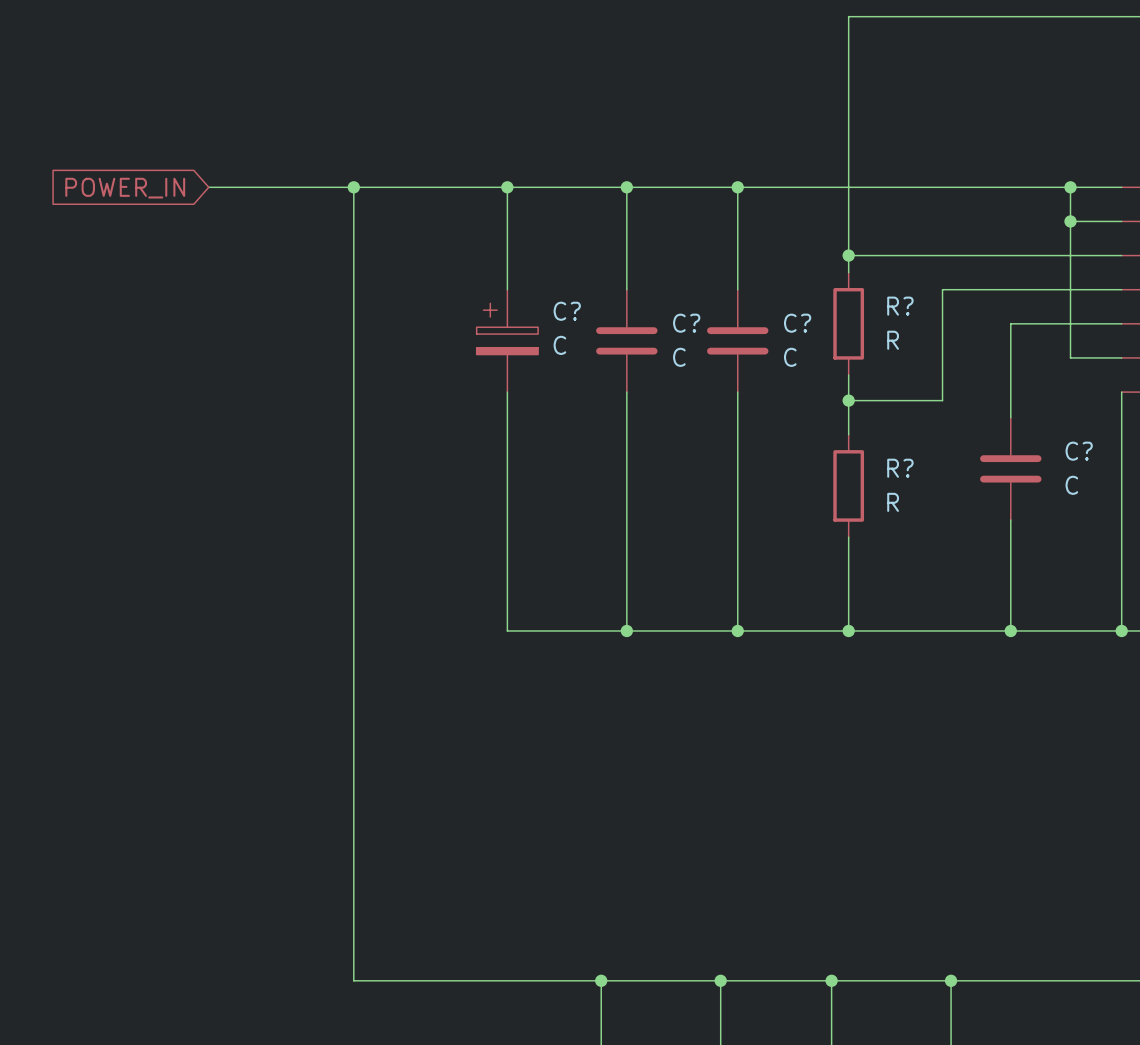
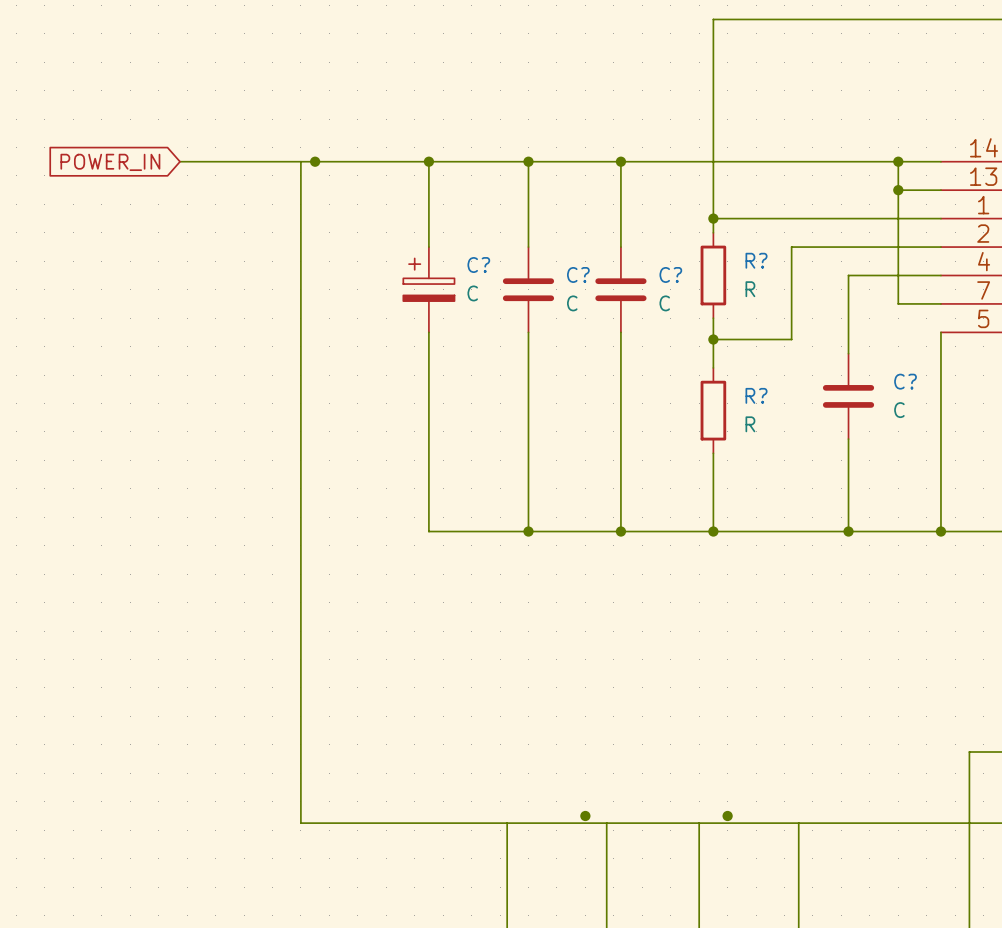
junction position: (353, 187) -> (315, 161)
junction: (601, 980) -> none
junction position: (720, 980) -> (585, 816)
junction position: (831, 980) -> (727, 816)
junction: (951, 980) -> none

